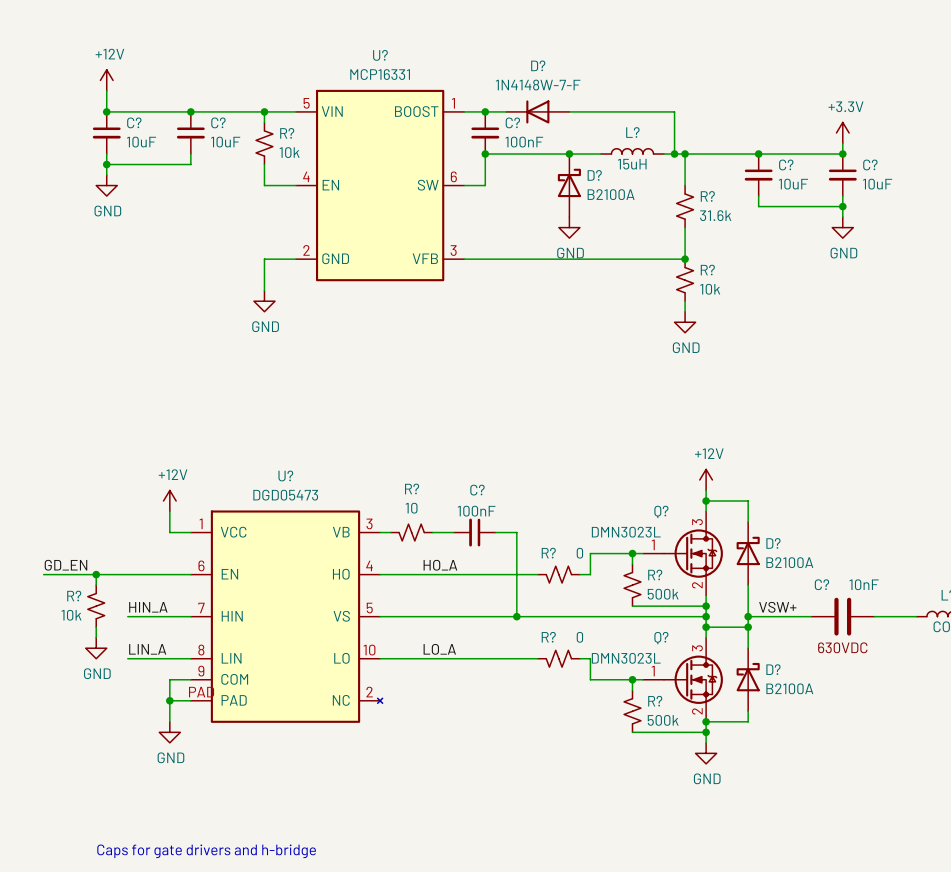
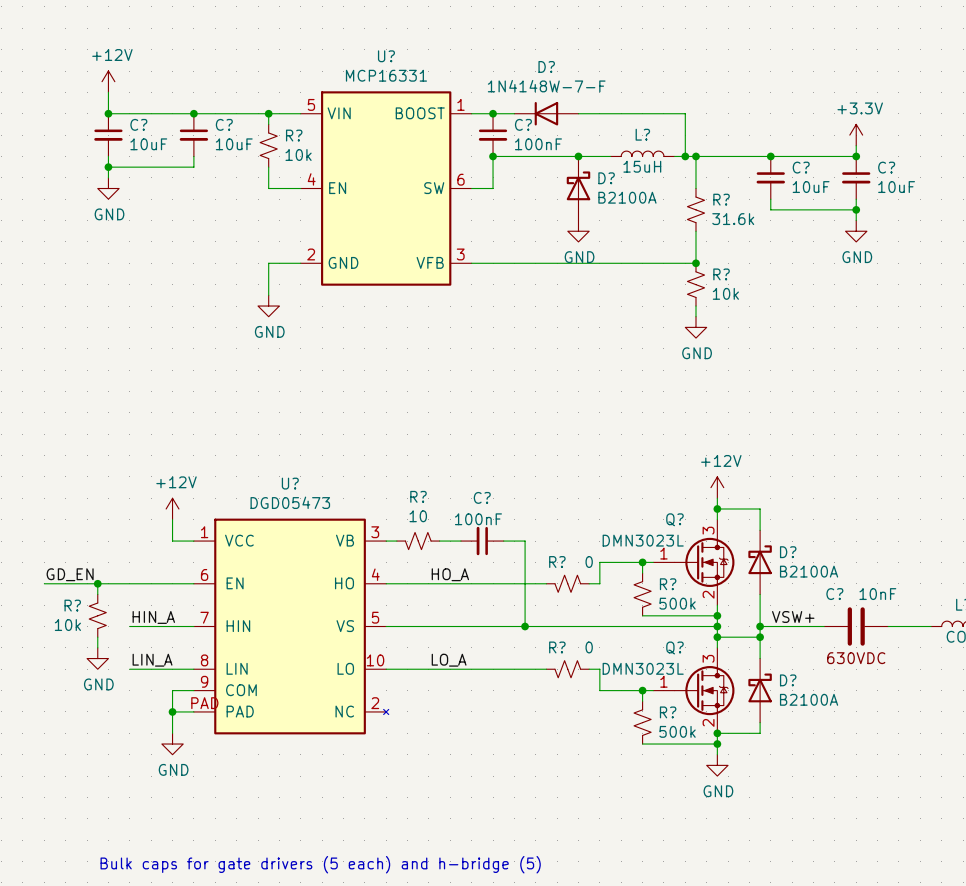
text: Caps for gate drivers and h-bridge (206, 851) -> Bulk caps for gate drivers (5 each) and h-bridge (5) (320, 864)

